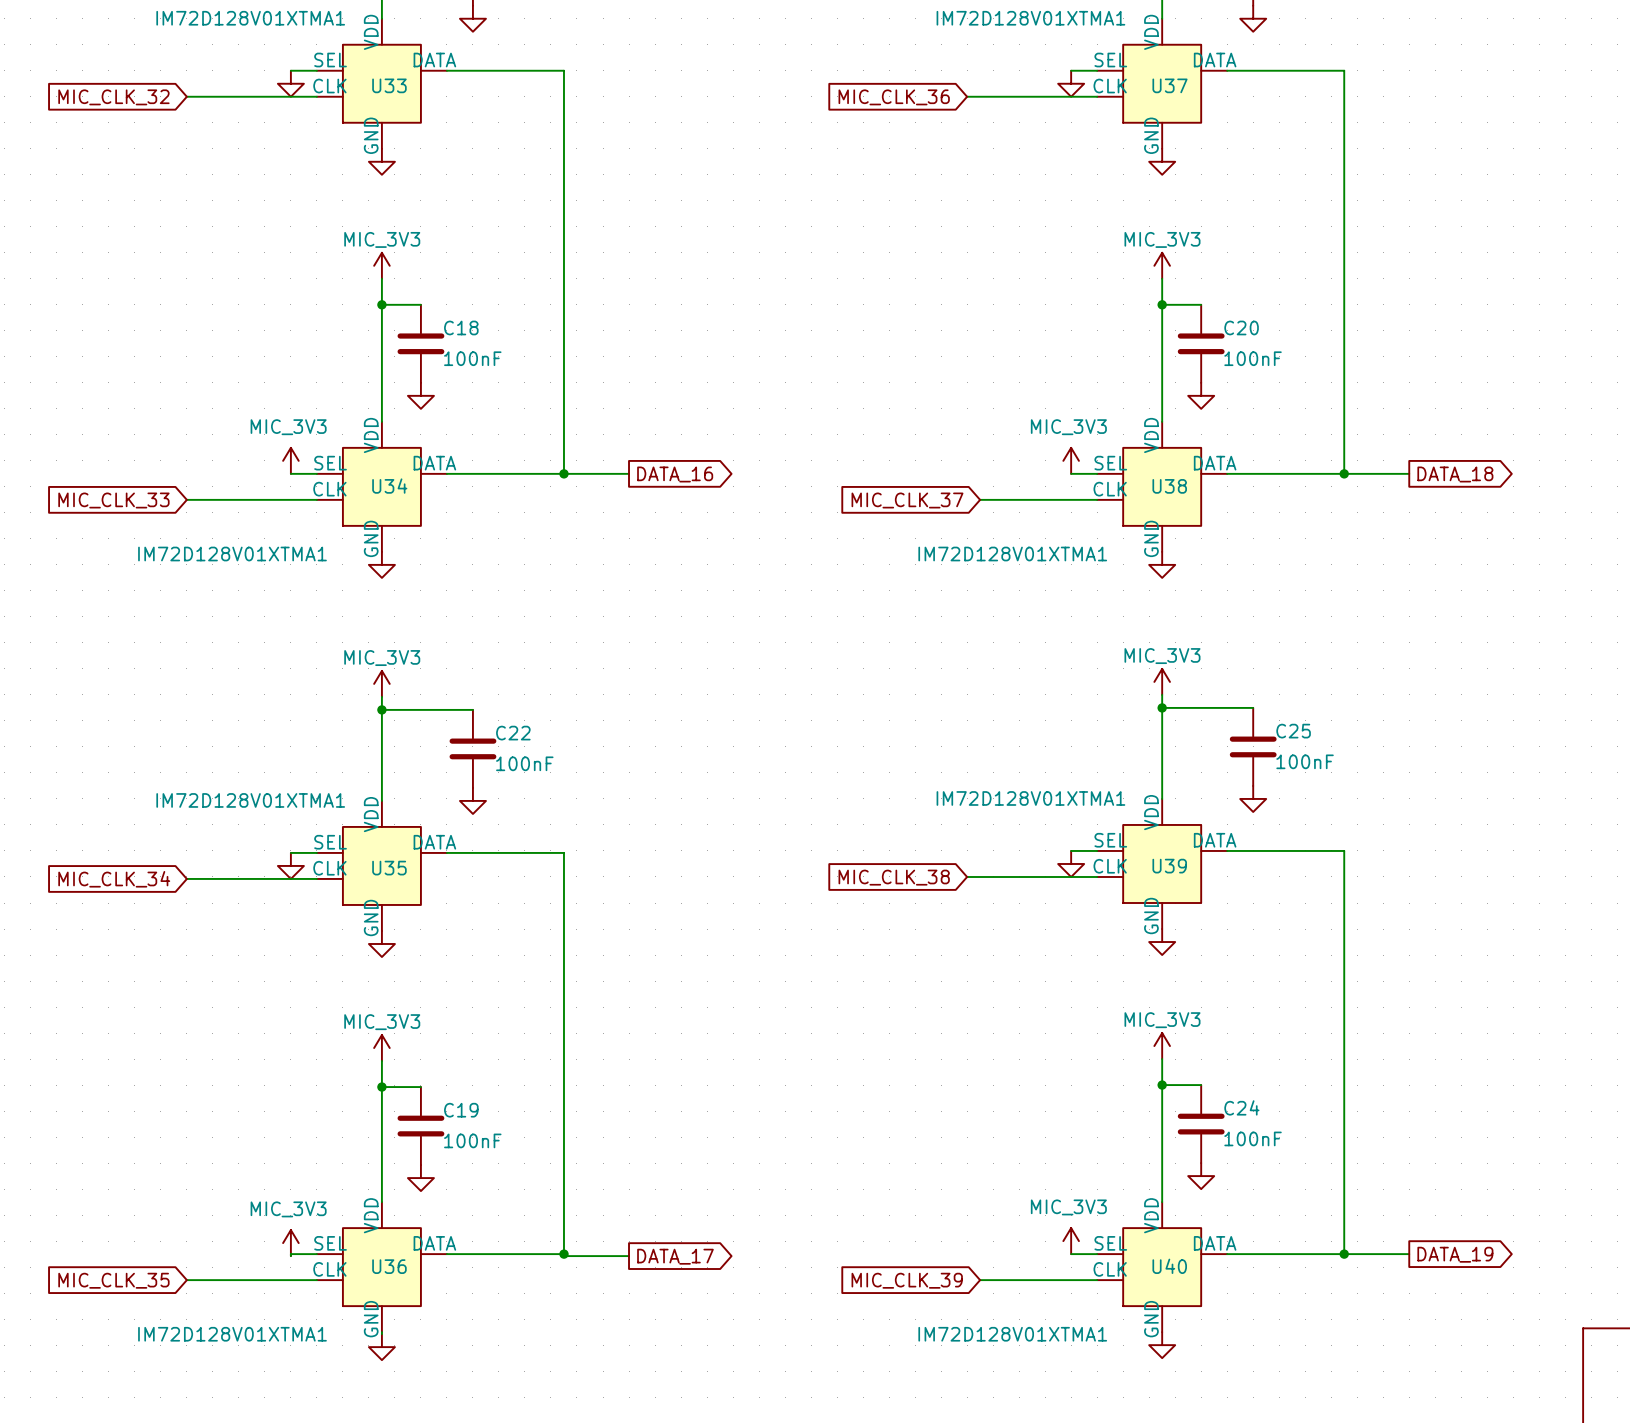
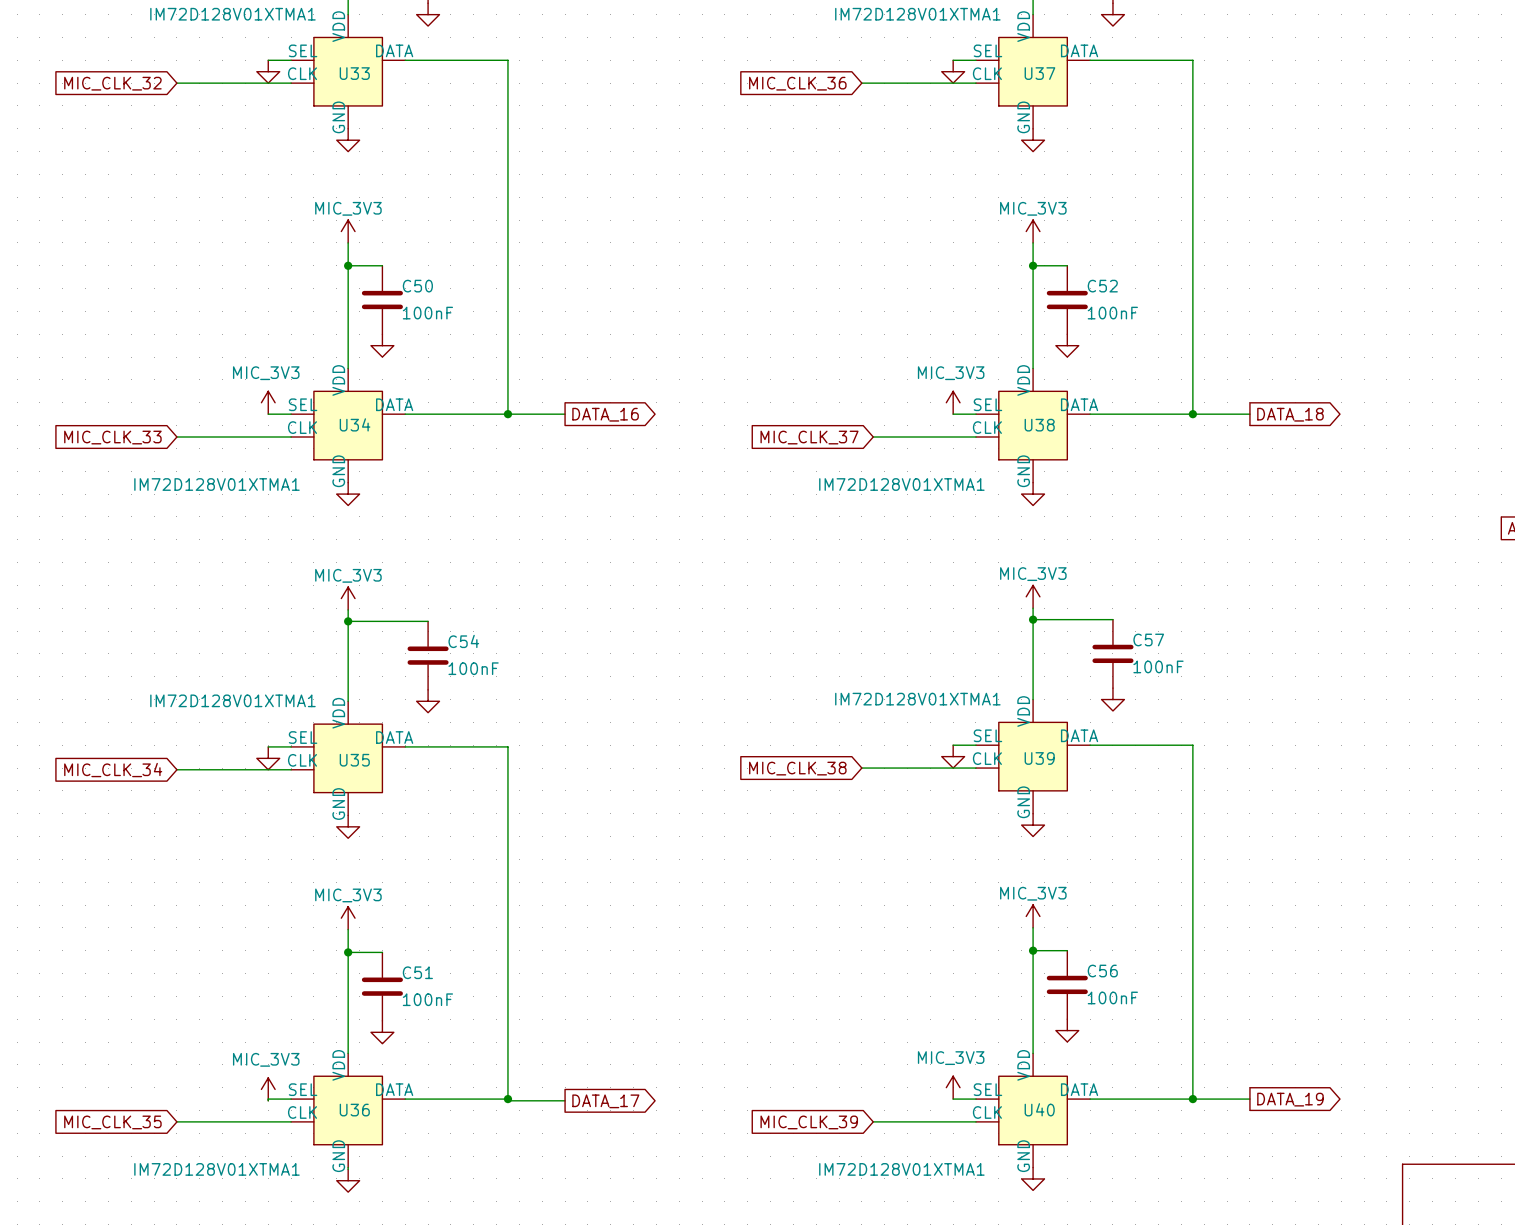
C18 name: C18 (461, 327) -> C50 (417, 286)
C20 name: C20 (1241, 327) -> C52 (1102, 286)
C25 name: C25 (1293, 731) -> C57 (1148, 639)
C22 name: C22 (513, 733) -> C54 (463, 641)
C24 name: C24 (1241, 1107) -> C56 (1102, 971)
C19 name: C19 (461, 1110) -> C51 (417, 972)

